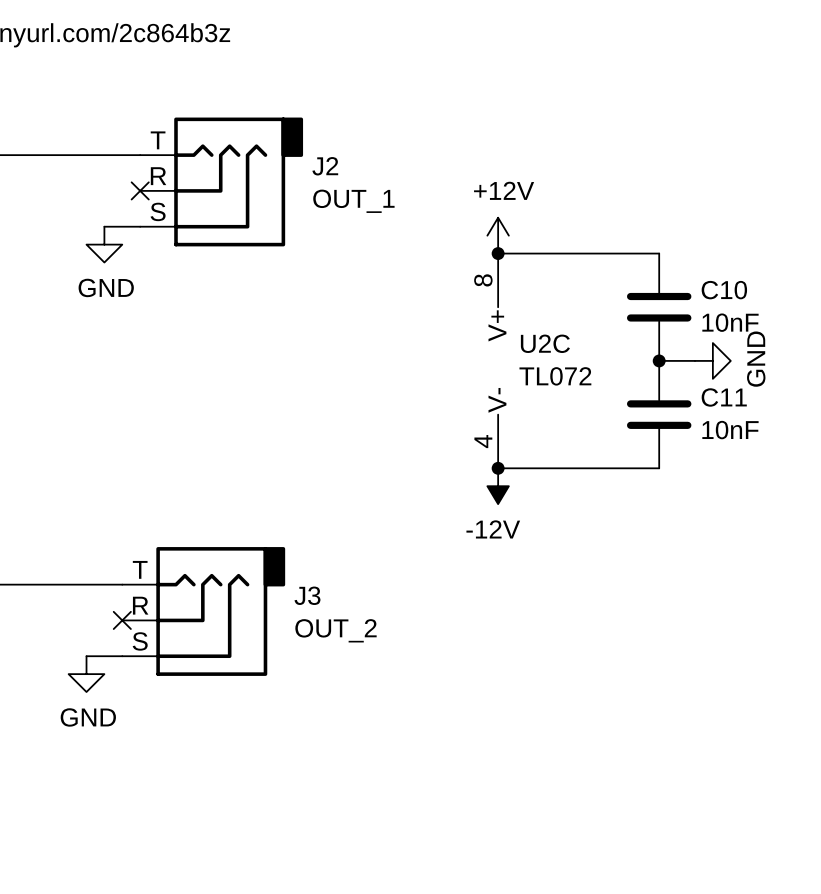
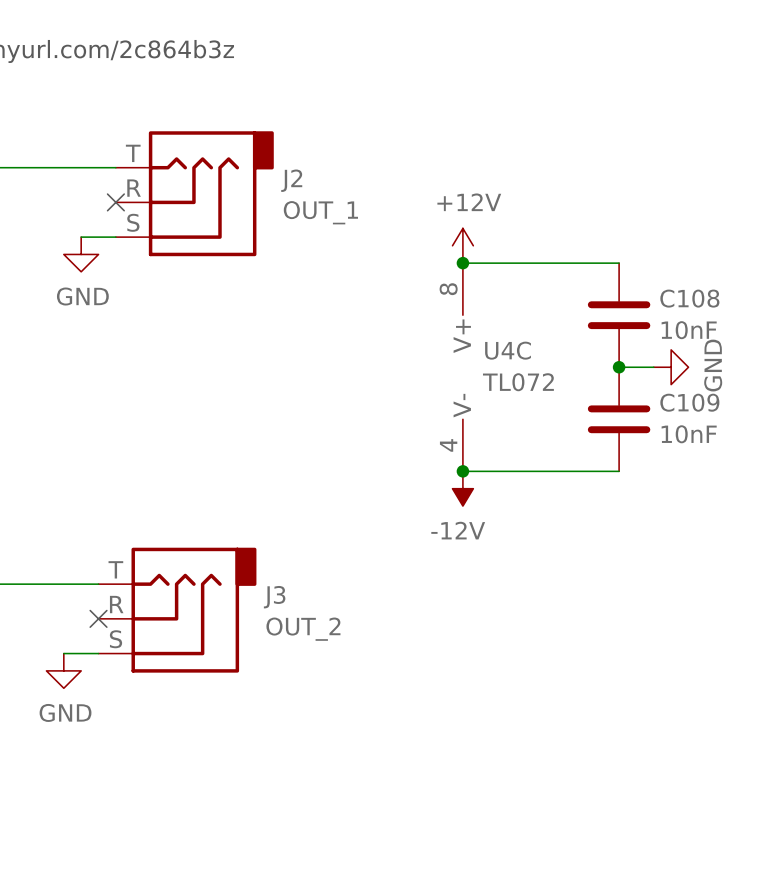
C10 name: C10 (724, 290) -> C108 (689, 298)
U2C name: U2C (545, 343) -> U4C (508, 350)
C11 name: C11 (724, 397) -> C109 (689, 402)

